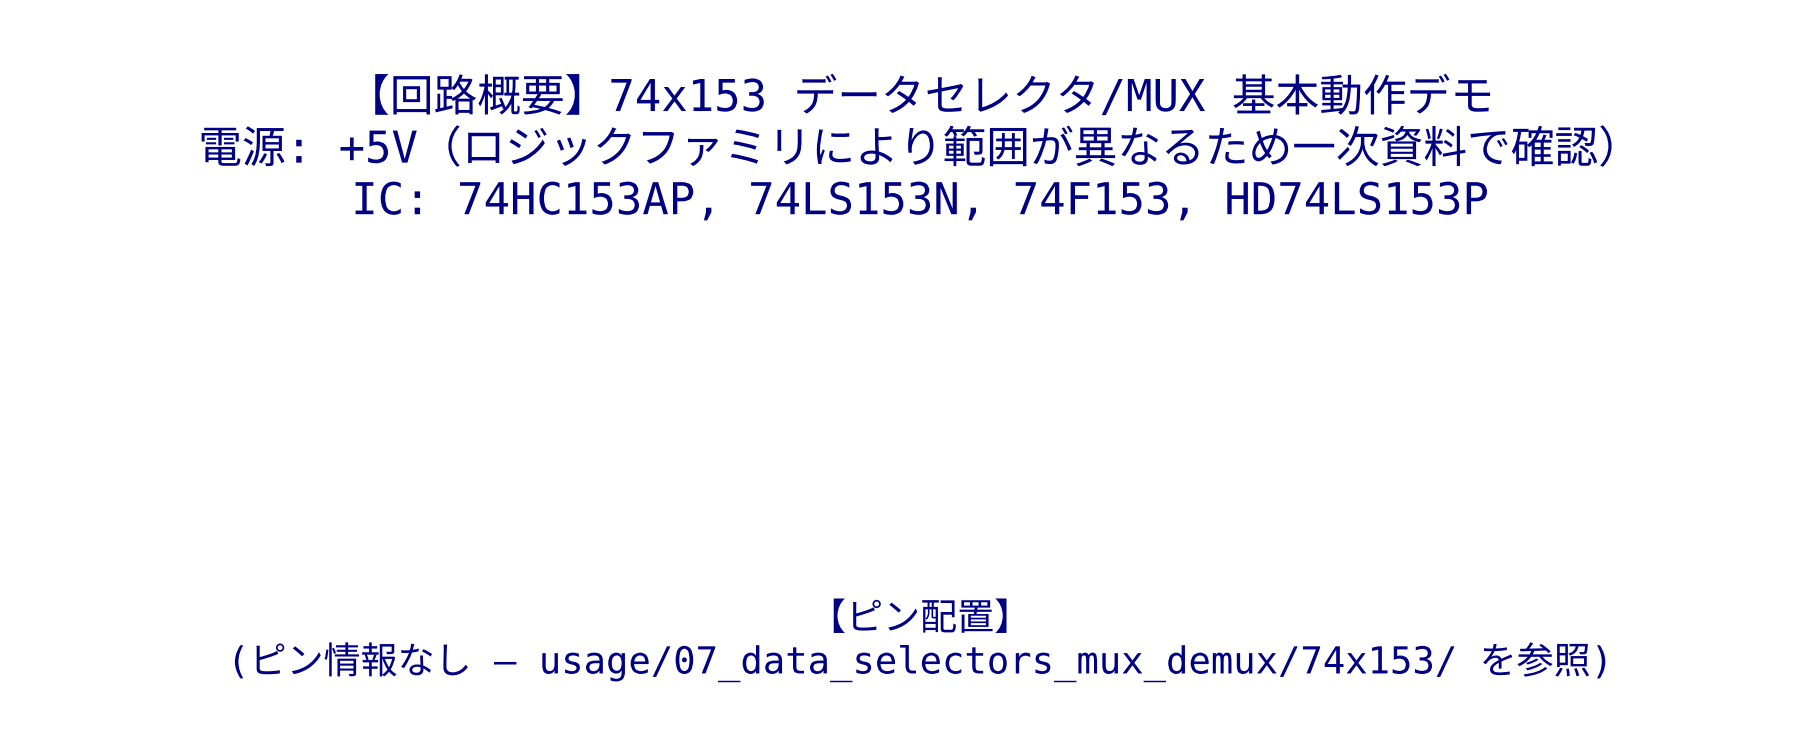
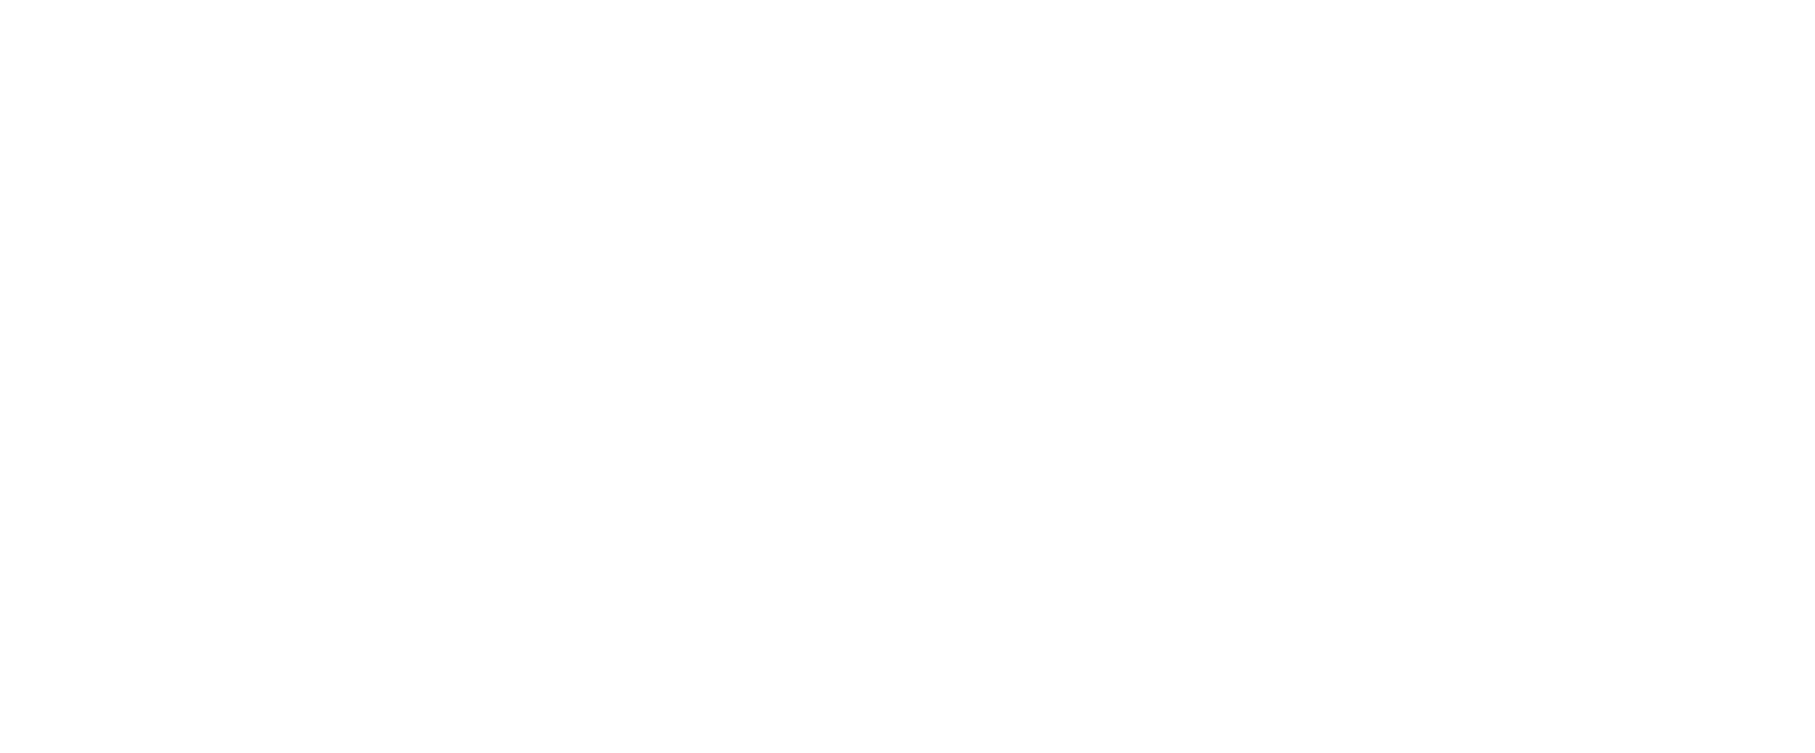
text: 【回路概要】74x153 データセレクタ/MUX 基本動作デモ (932, 94) -> none
text: 電源: +5V（ロジックファミリにより範囲が異なるため一次資料で確認） (906, 146) -> none
text: IC: 74HC153AP, 74LS153N, 74F153, HD74LS153P (921, 200) -> none
text: 【ピン配置】 (920, 615) -> none
text: (ピン情報なし — usage/07_data_selectors_mux_demux/74x153/ を参照) (920, 662) -> none

